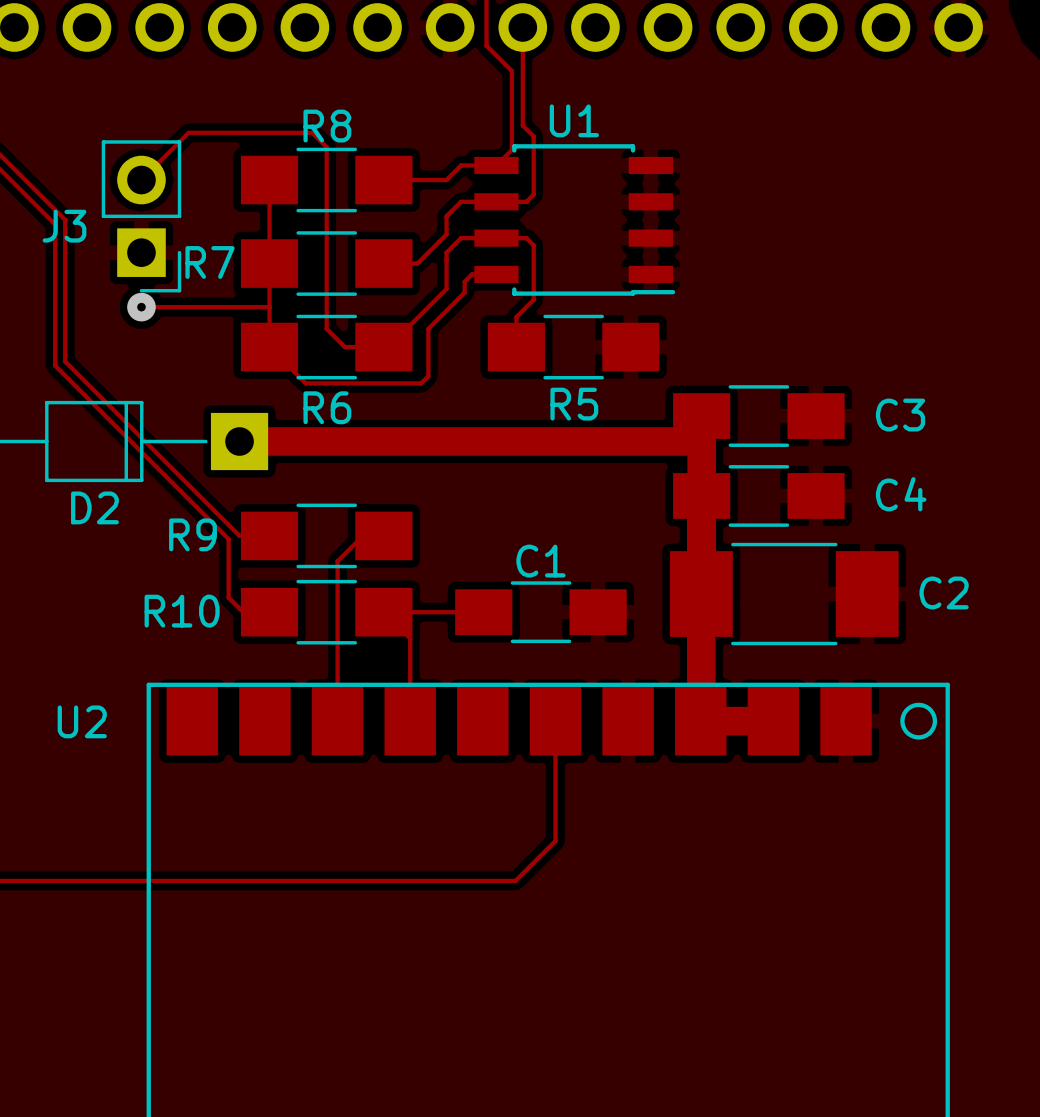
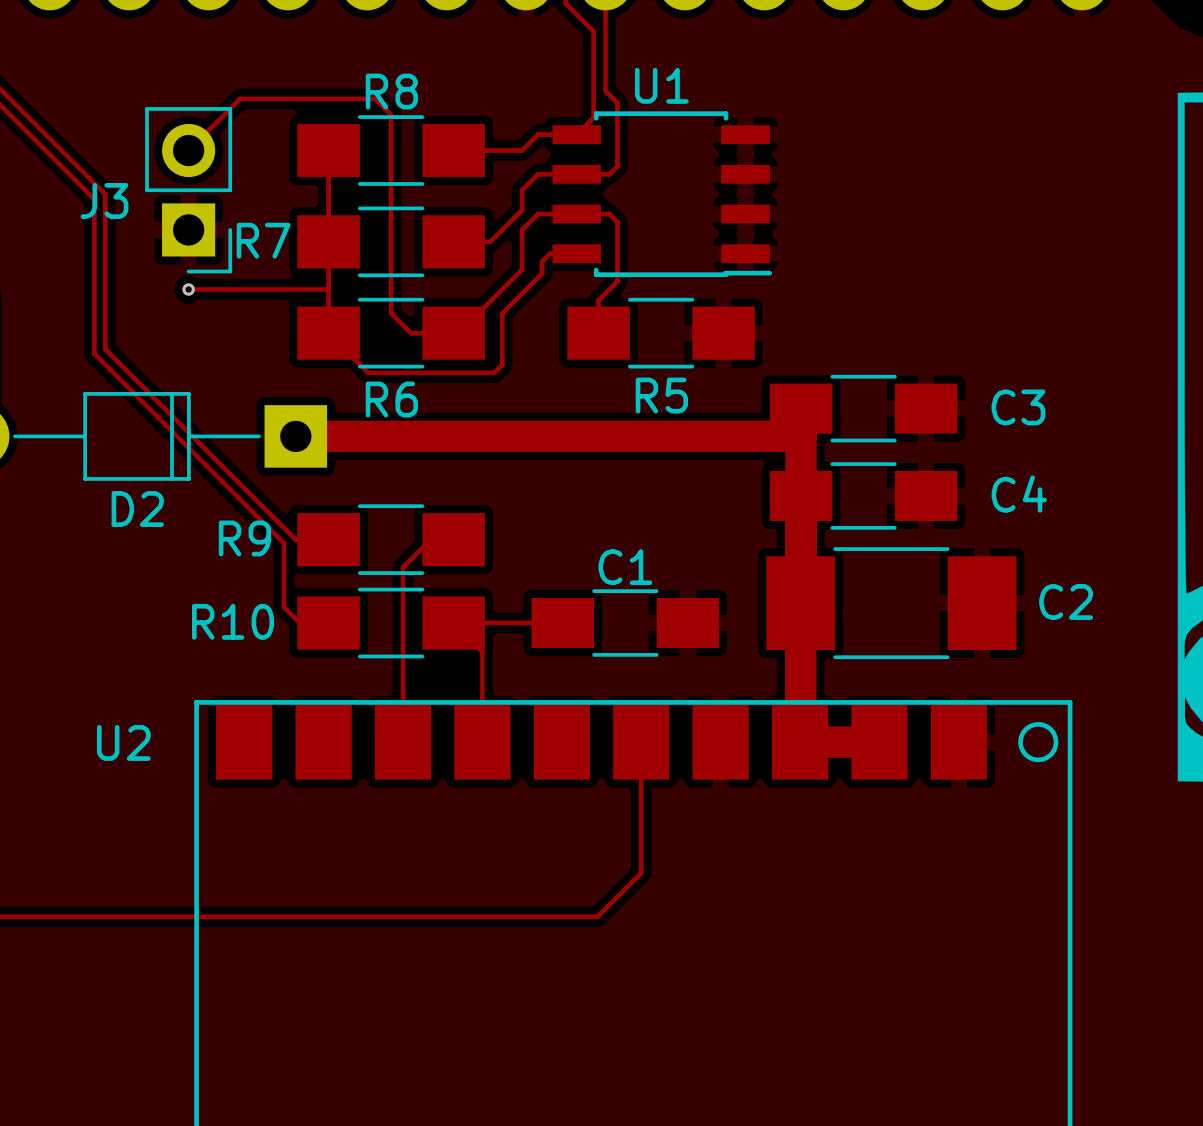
via size: [127, 292, 156, 322] -> [182, 283, 195, 296]

